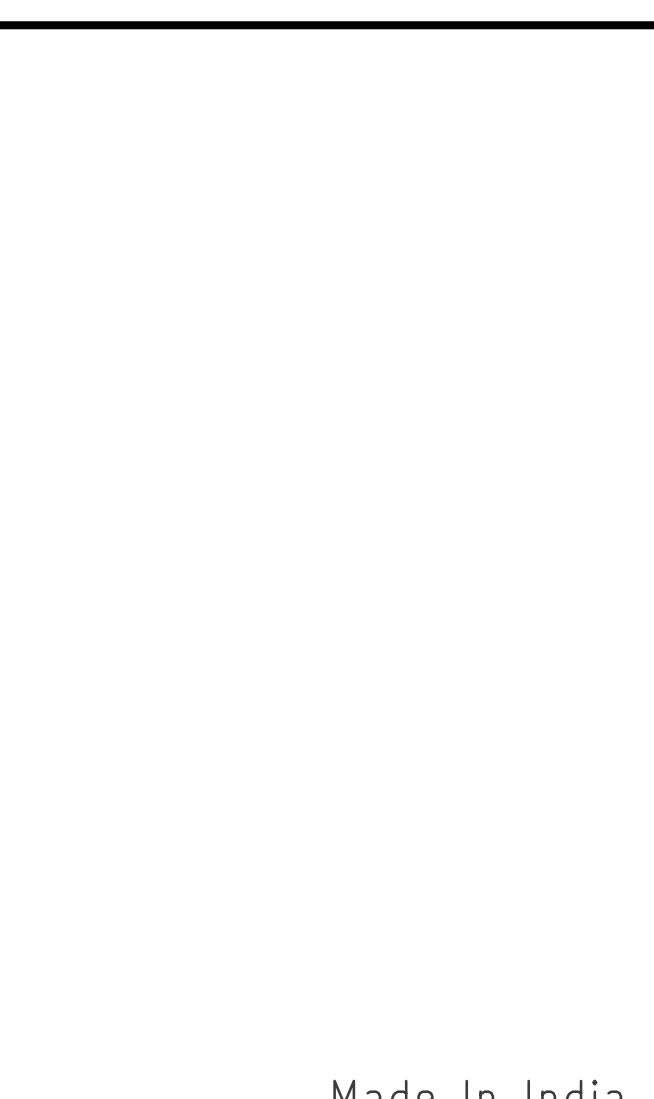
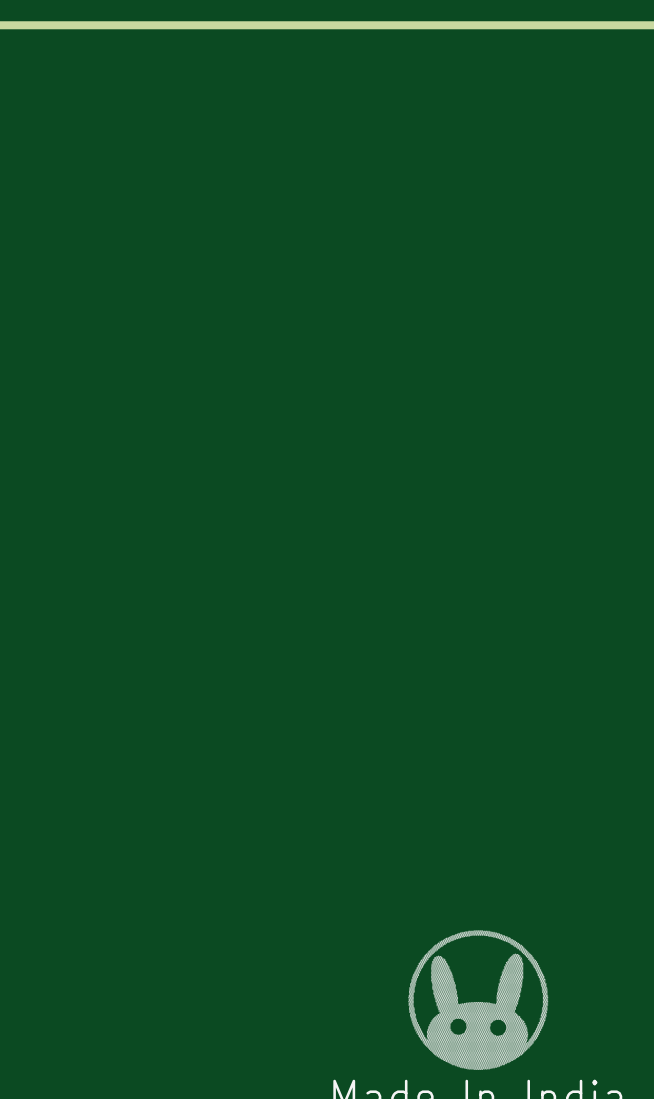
drawing: none -> [408, 930, 549, 1070]

